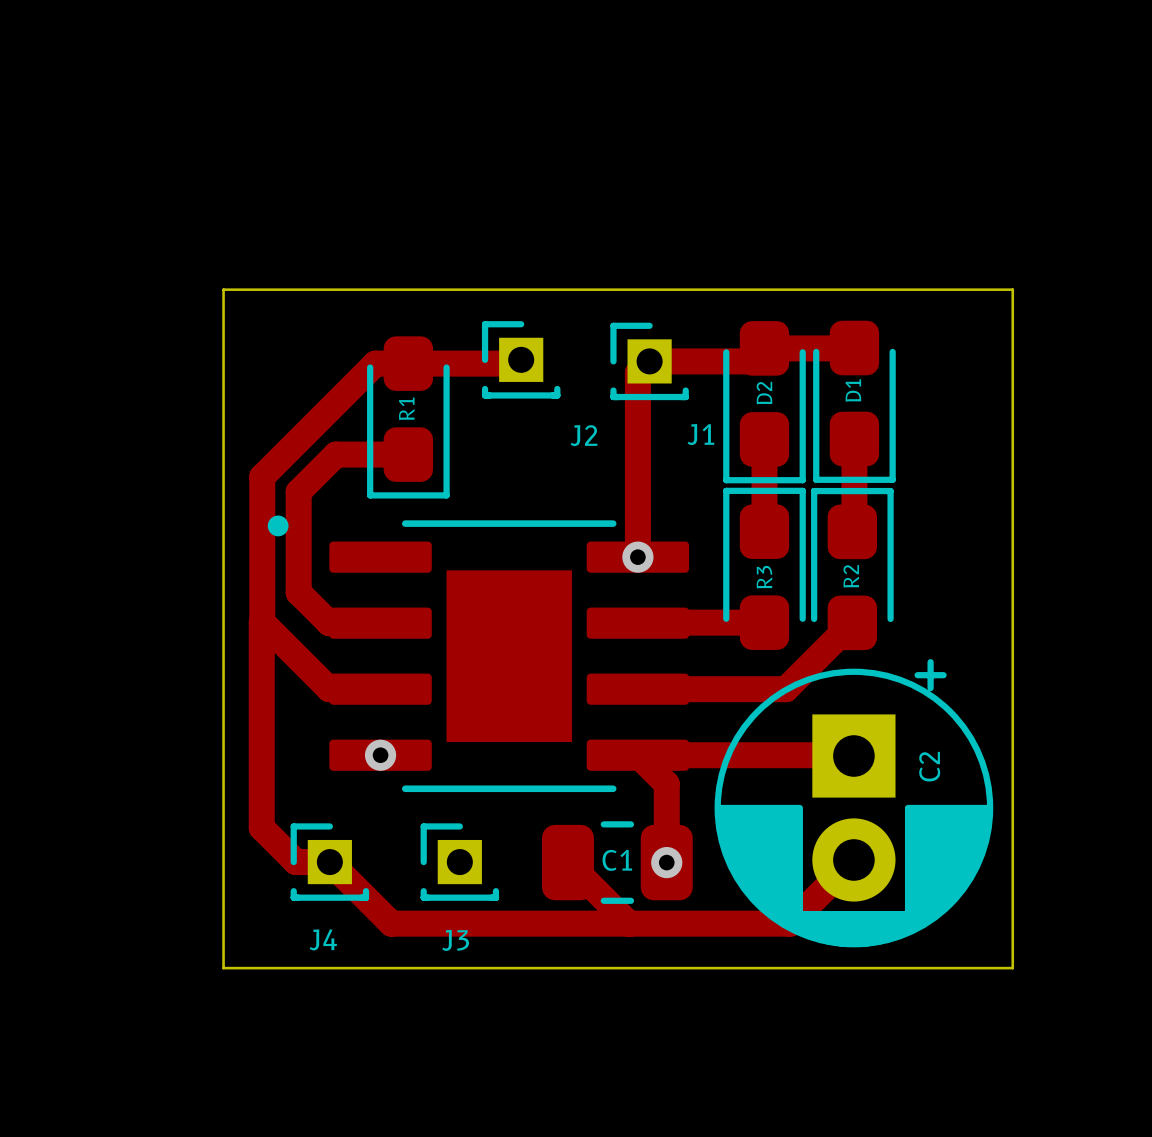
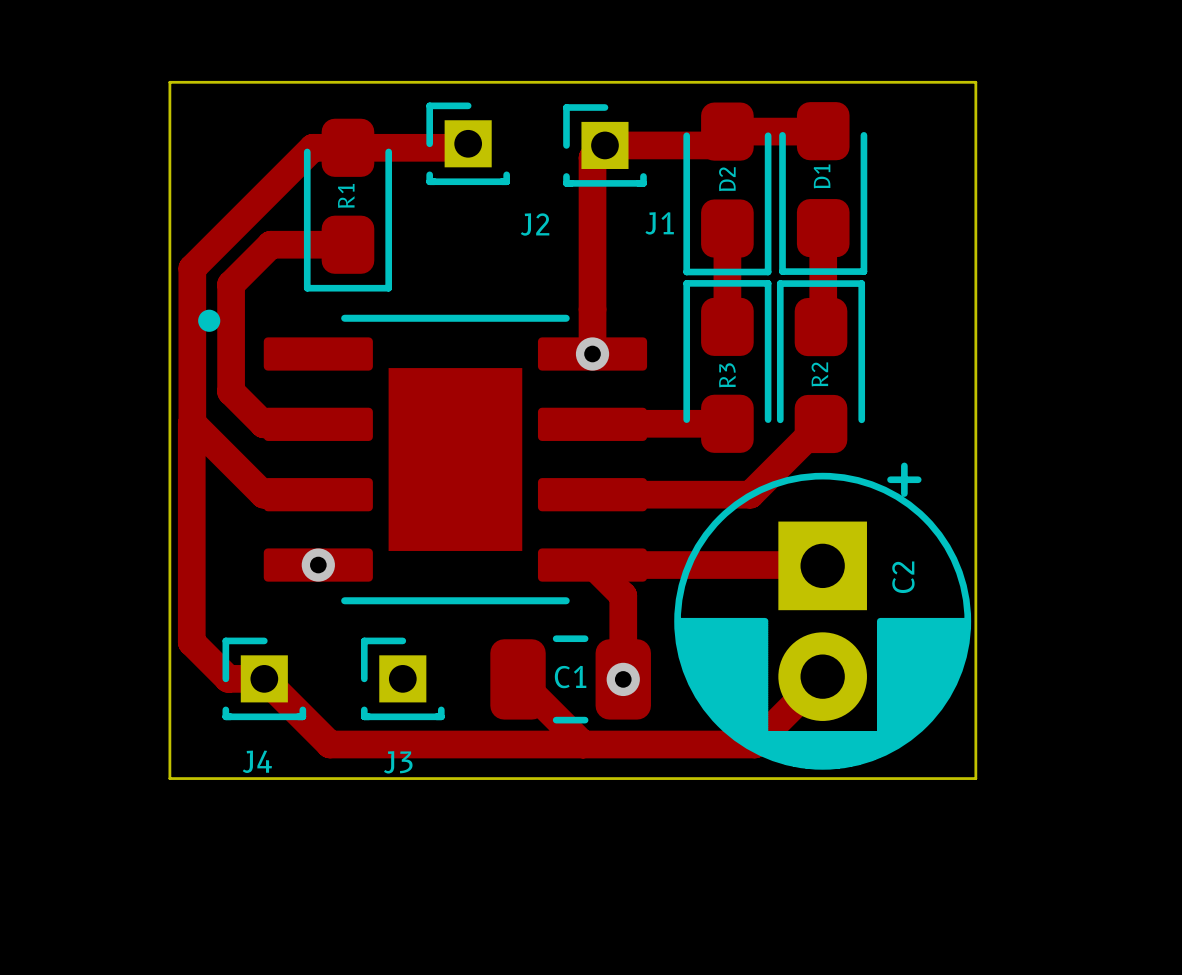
board edge: (223, 289) (1012, 289) (1012, 968) (223, 968) (223, 289) -> (169, 82) (169, 778) (975, 778) (975, 82) (169, 82)

